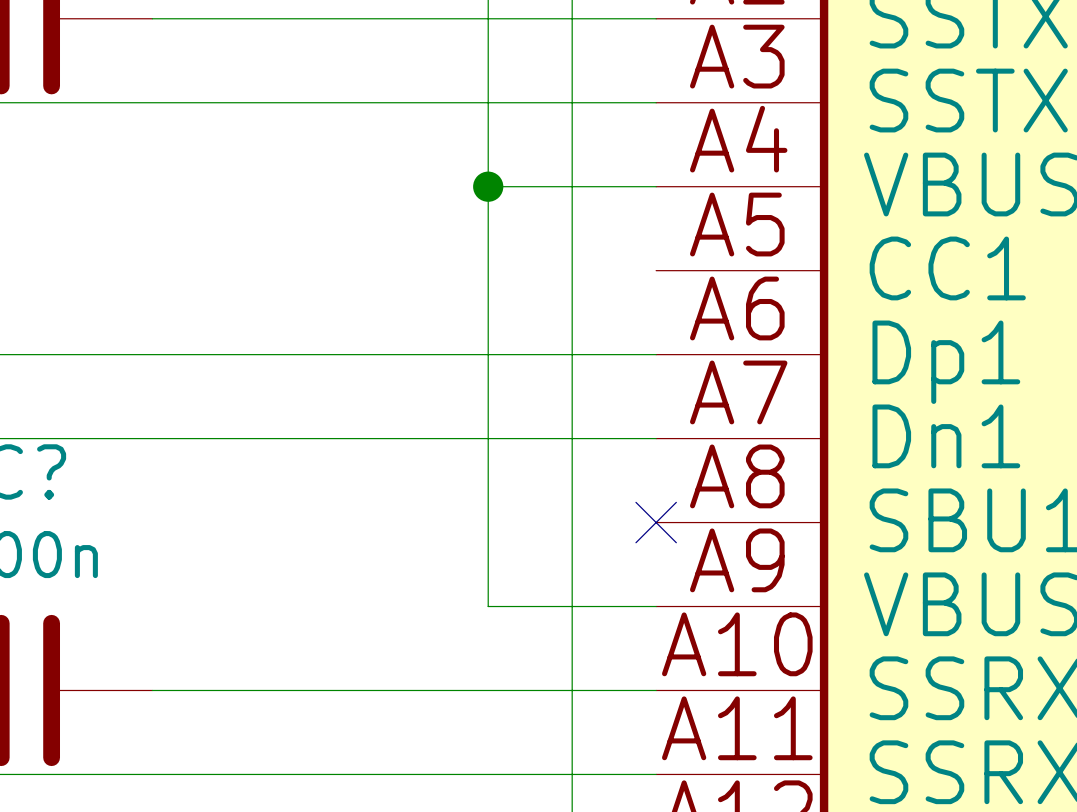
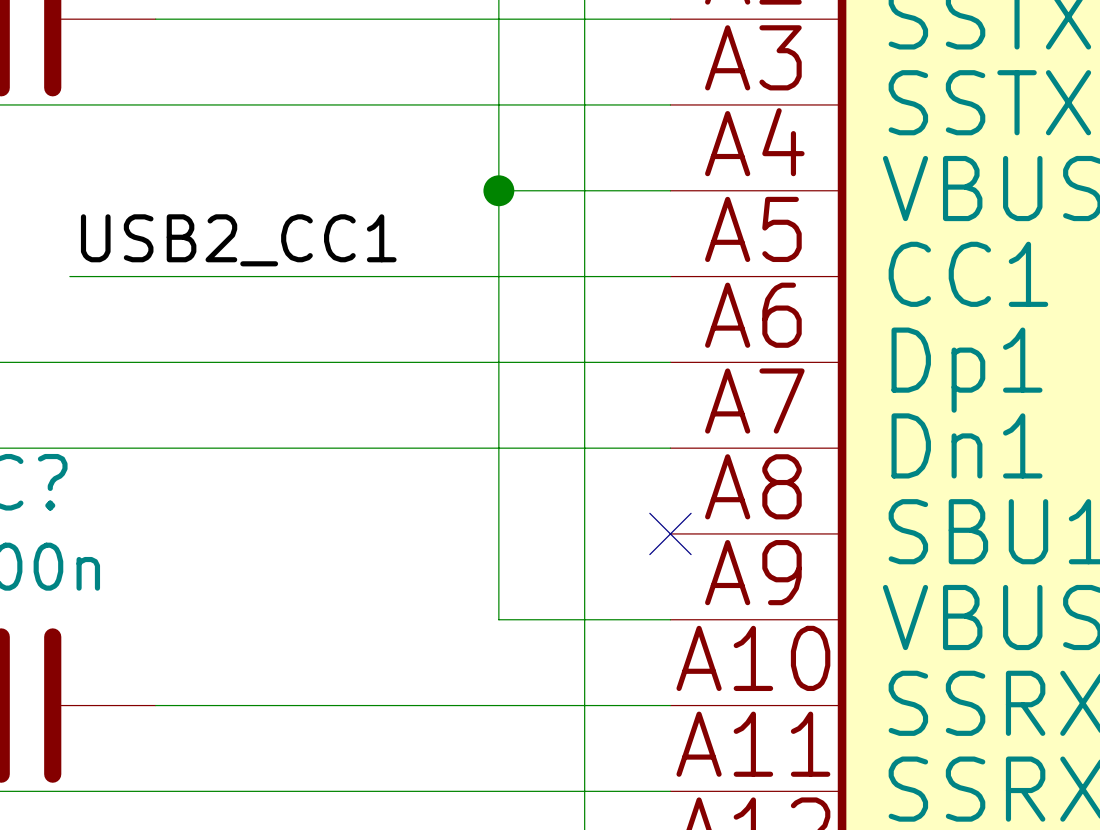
label: none -> USB2_CC1 (238, 240)
wire: none -> (69, 276) (670, 276)

